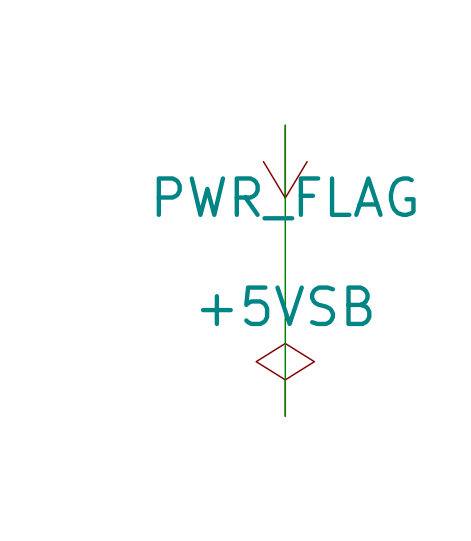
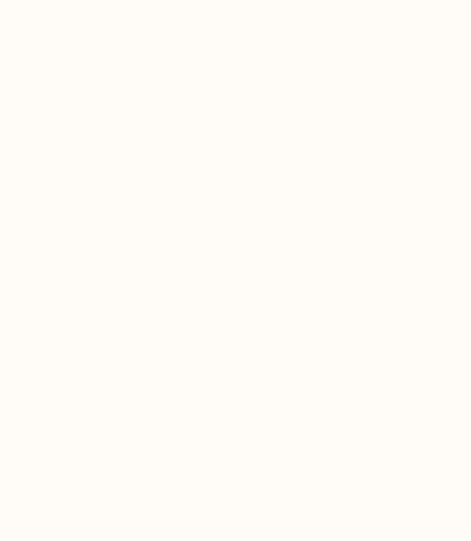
wire: (285, 125) (285, 416) -> none
power symbol: +5VSB (285, 161) -> none
power symbol: PWR_FLAG (285, 379) -> none

